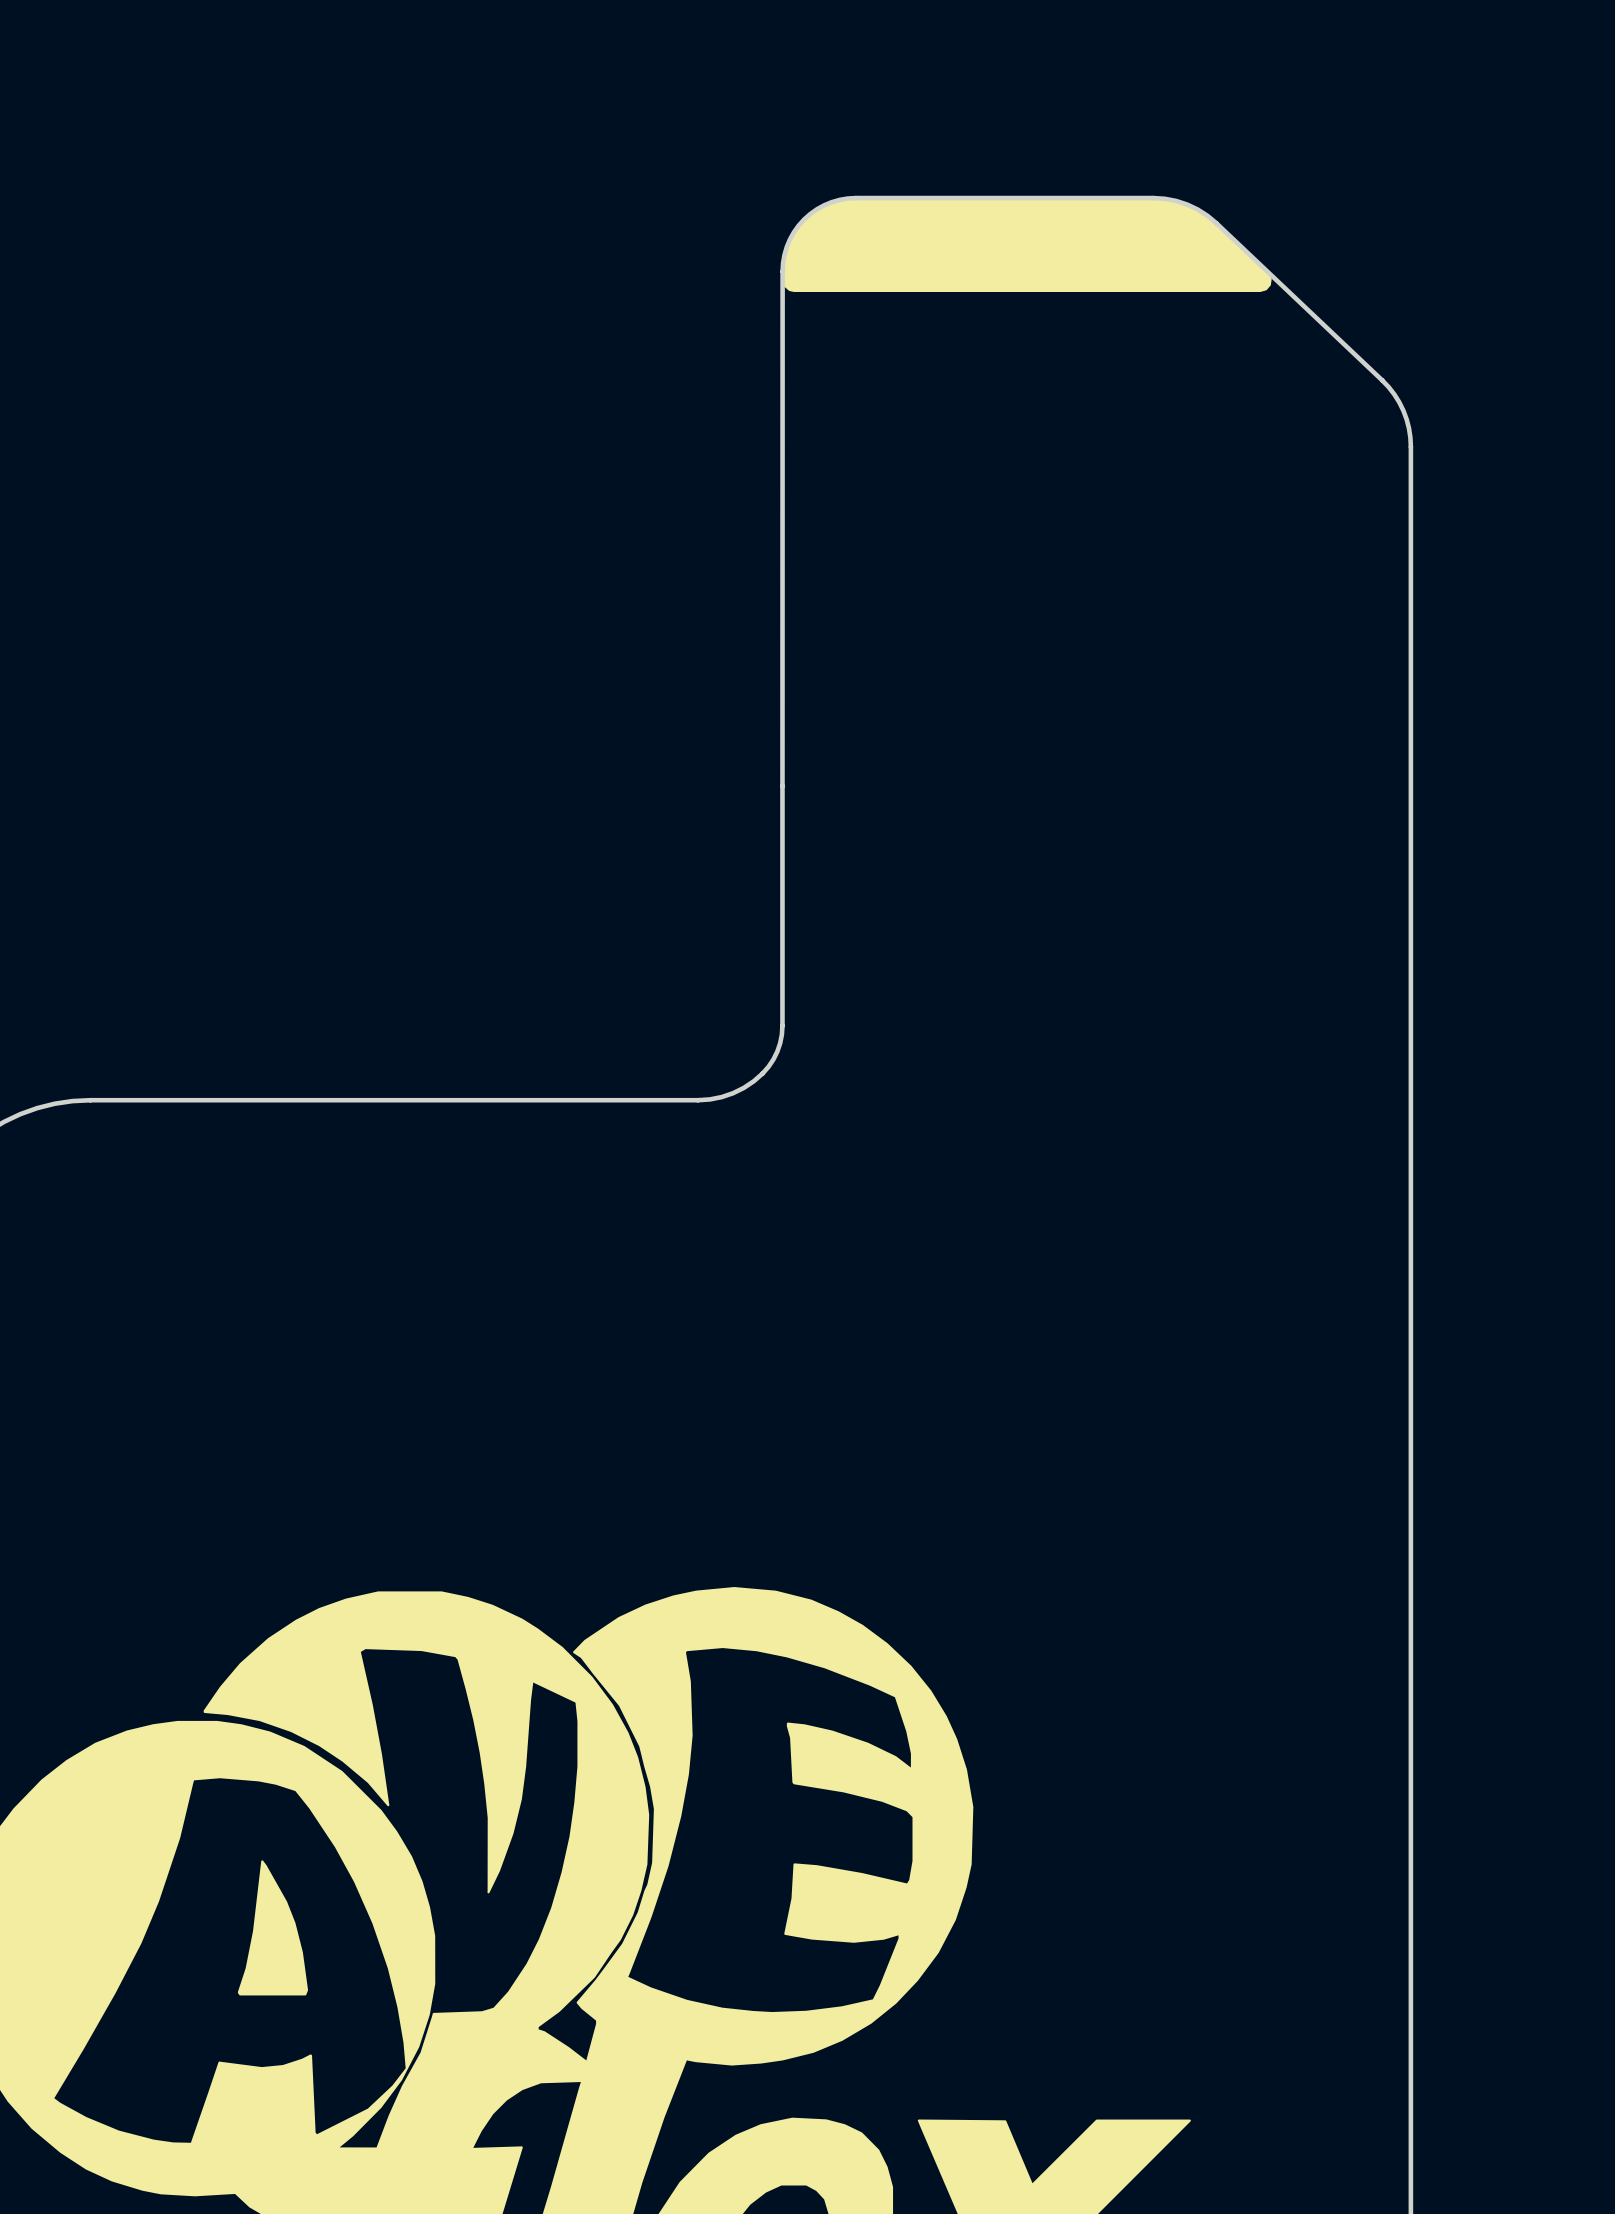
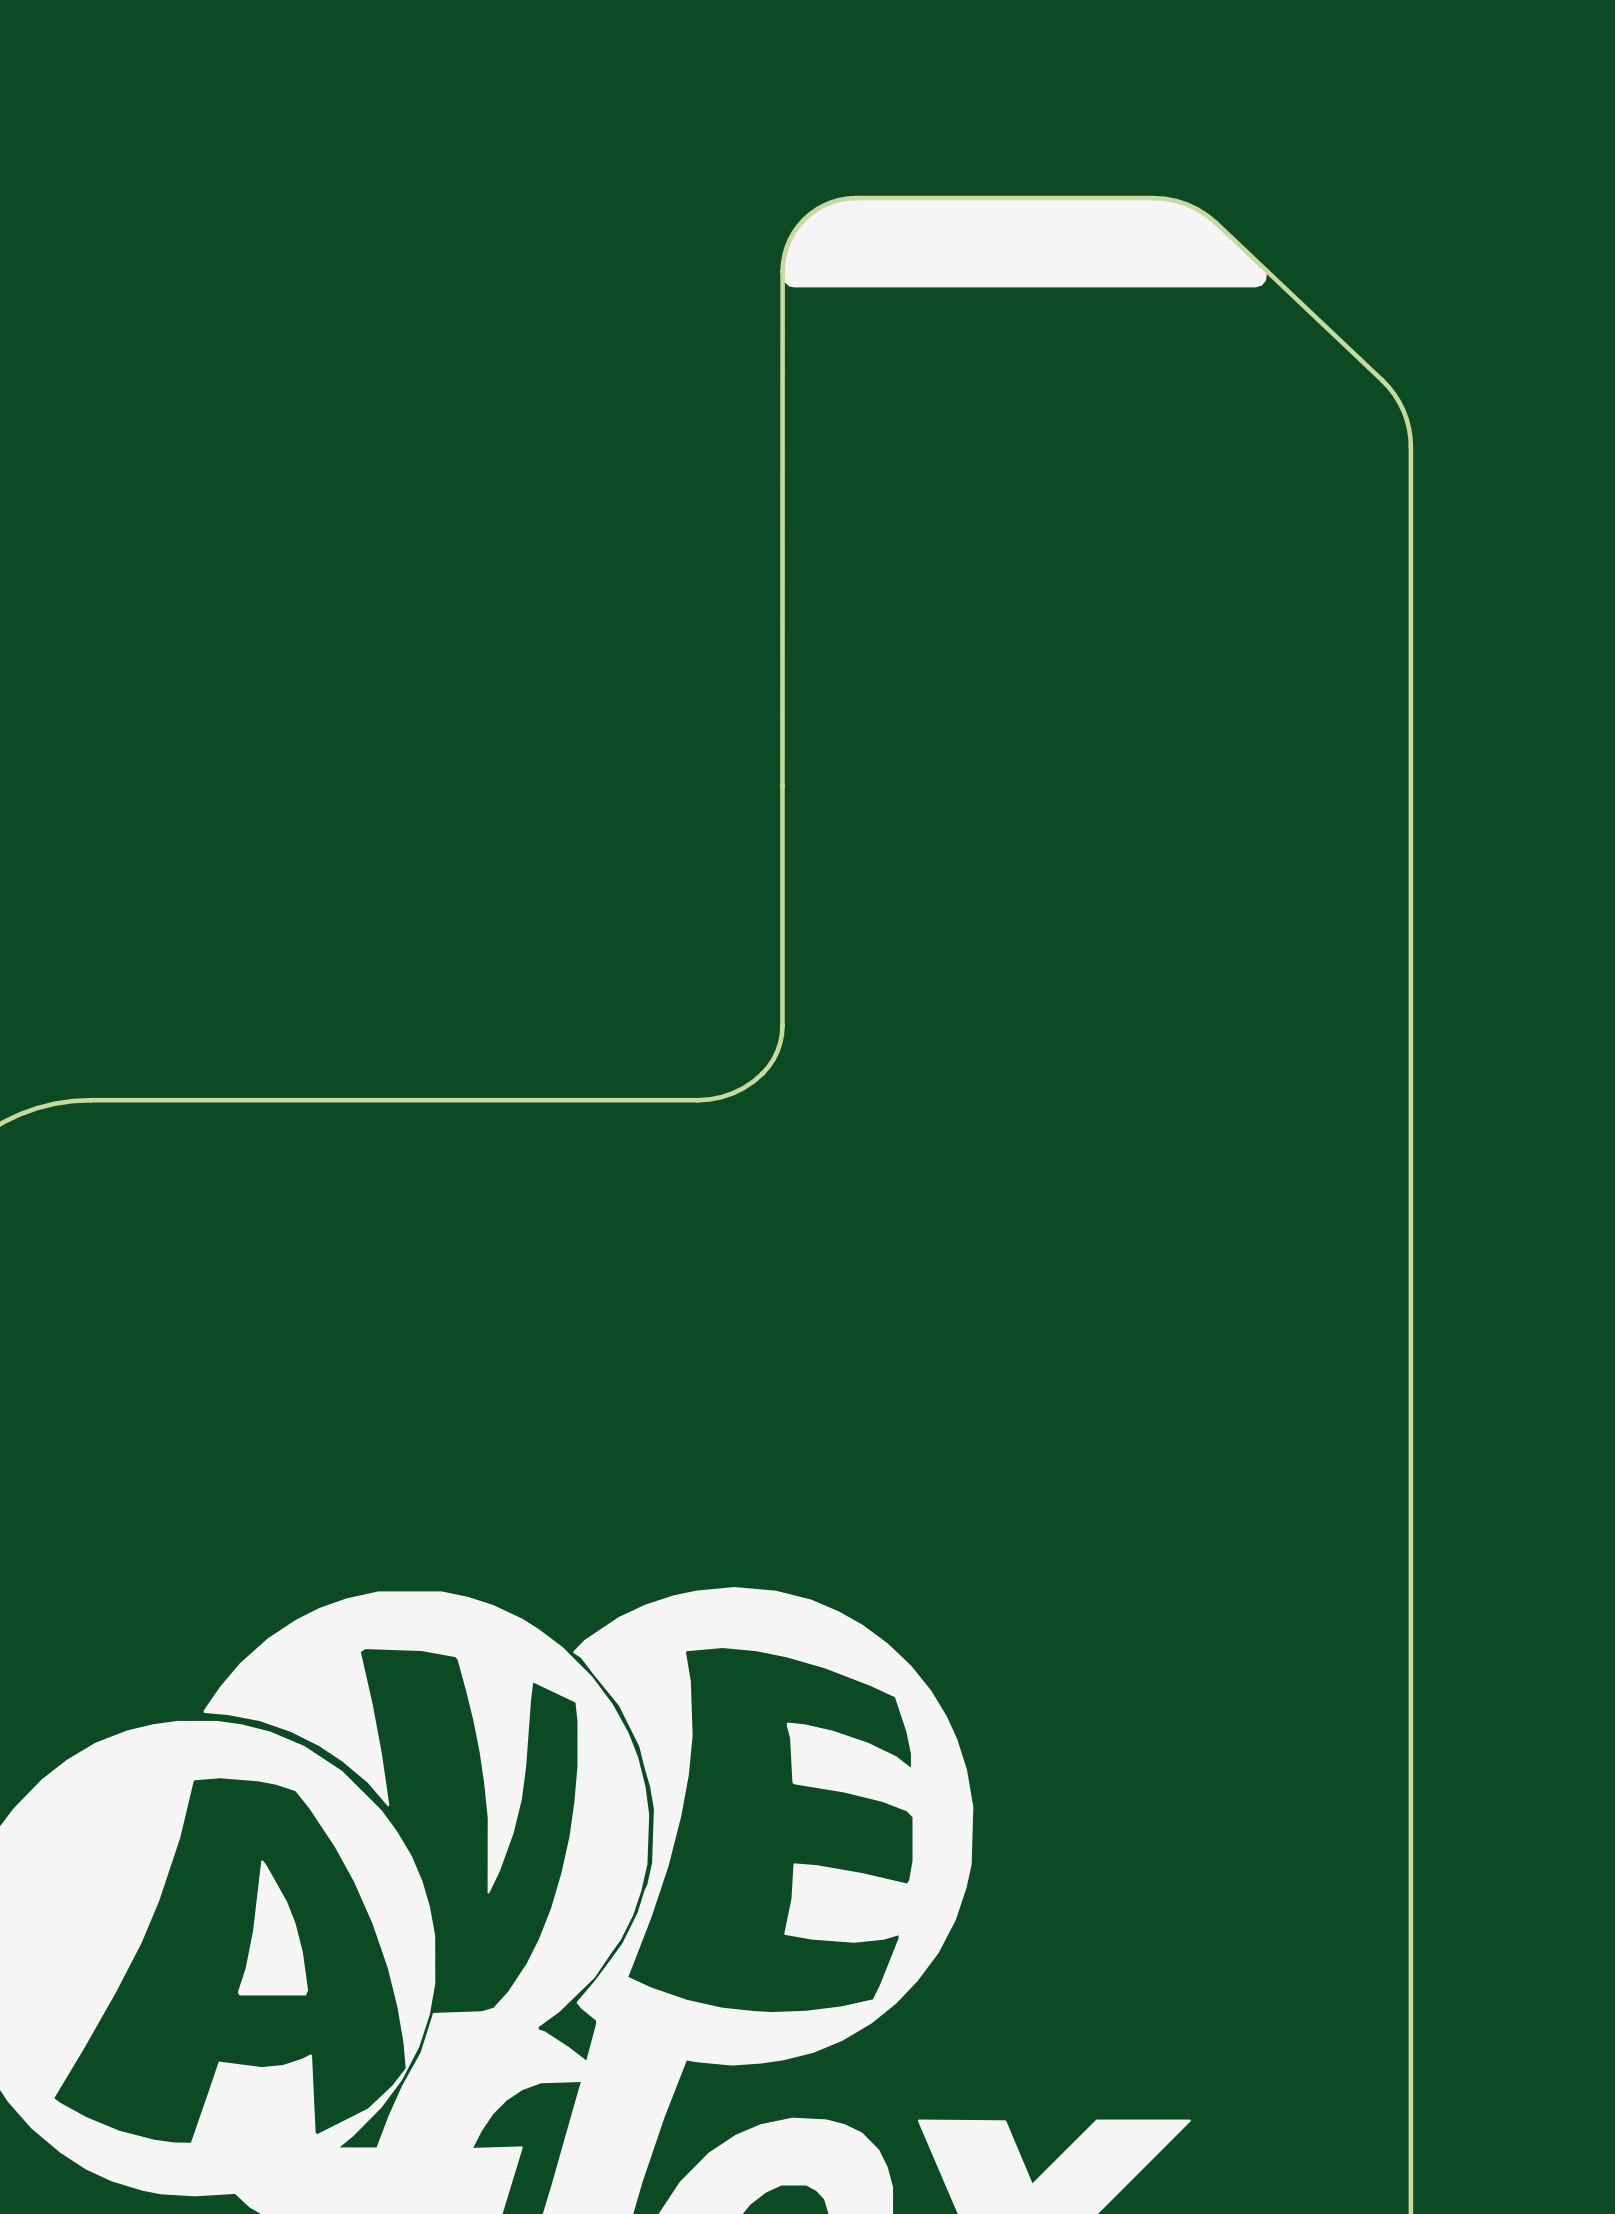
drawing shape: [782, 198, 1272, 292] -> [782, 198, 1267, 288]

